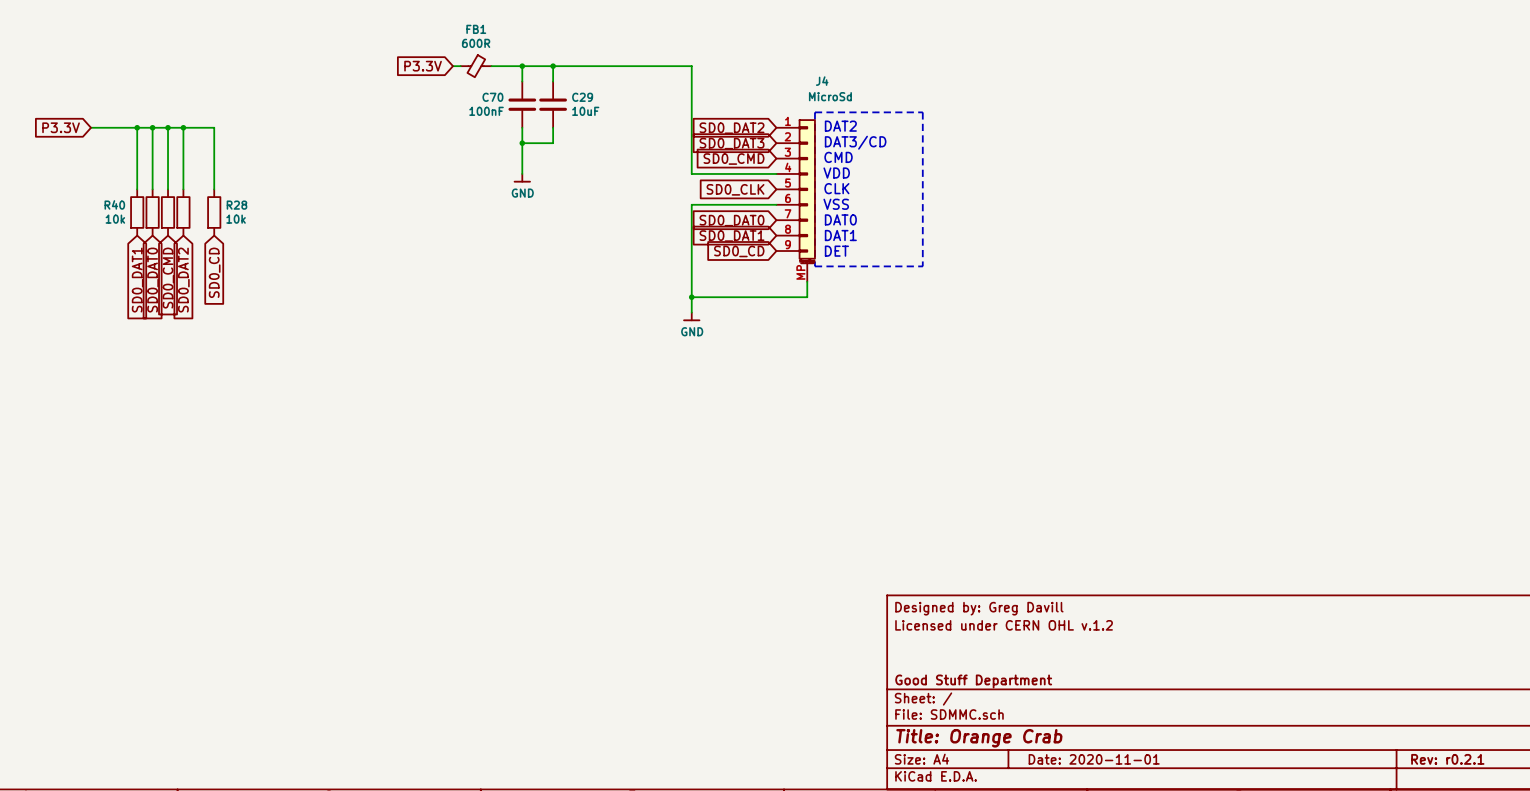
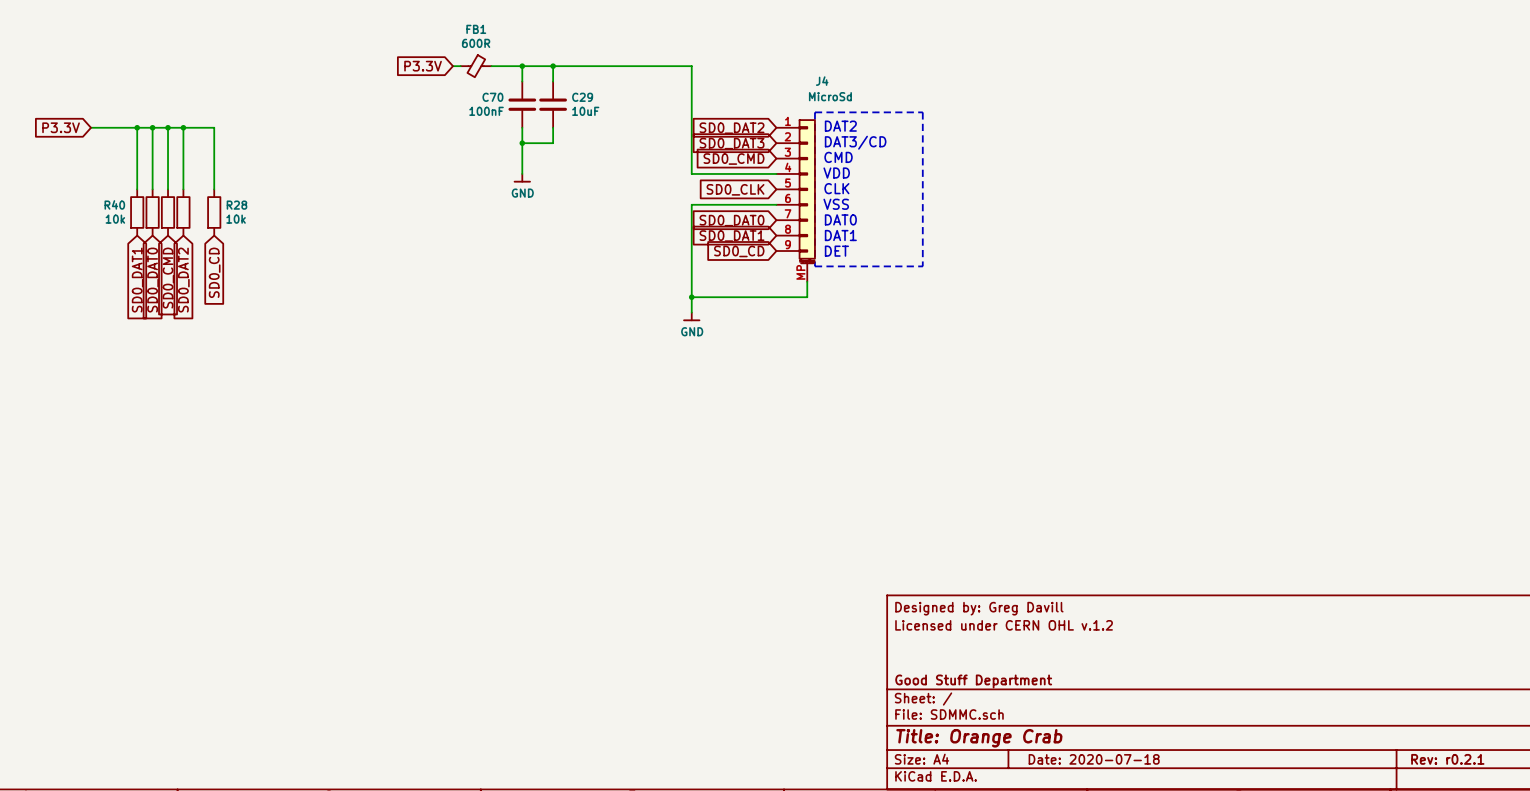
title block: Date: 2020-11-01 (1094, 759) -> Date: 2020-07-18 (1094, 759)

